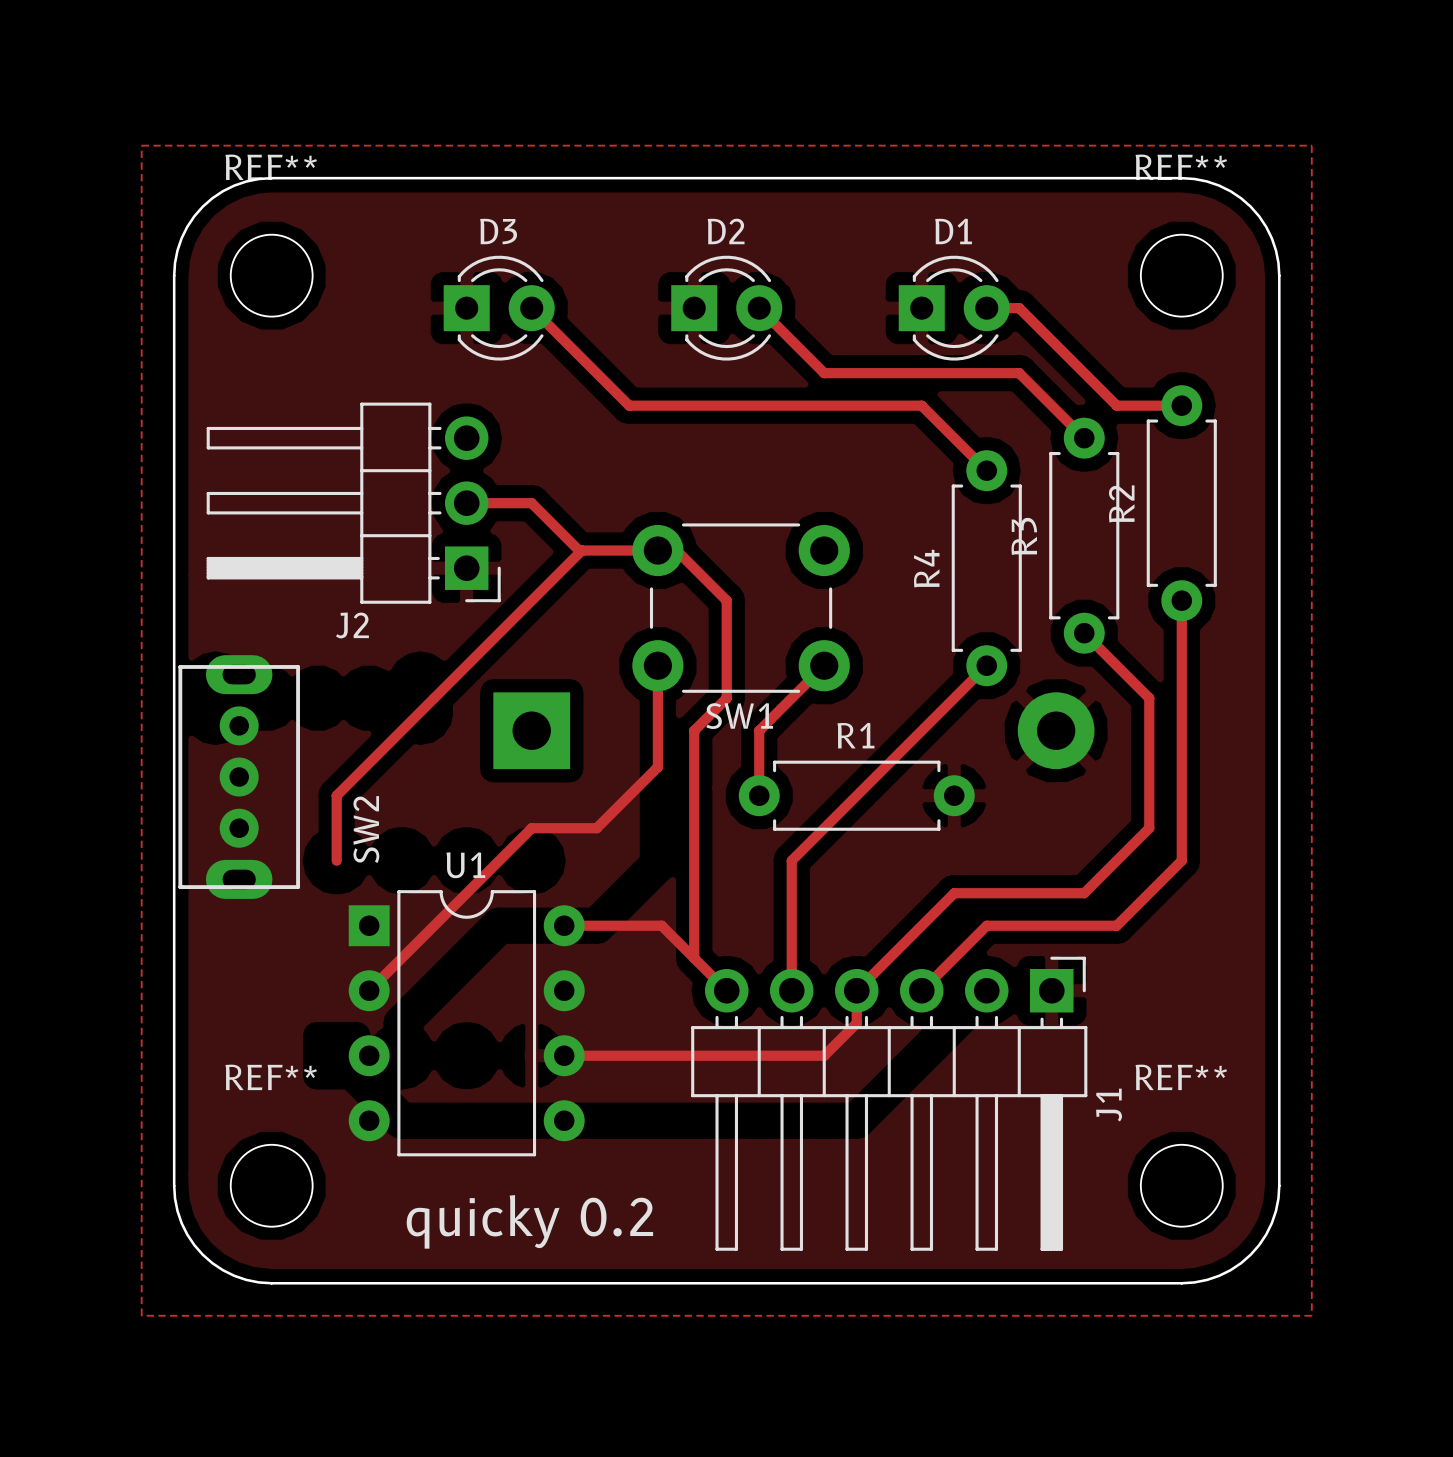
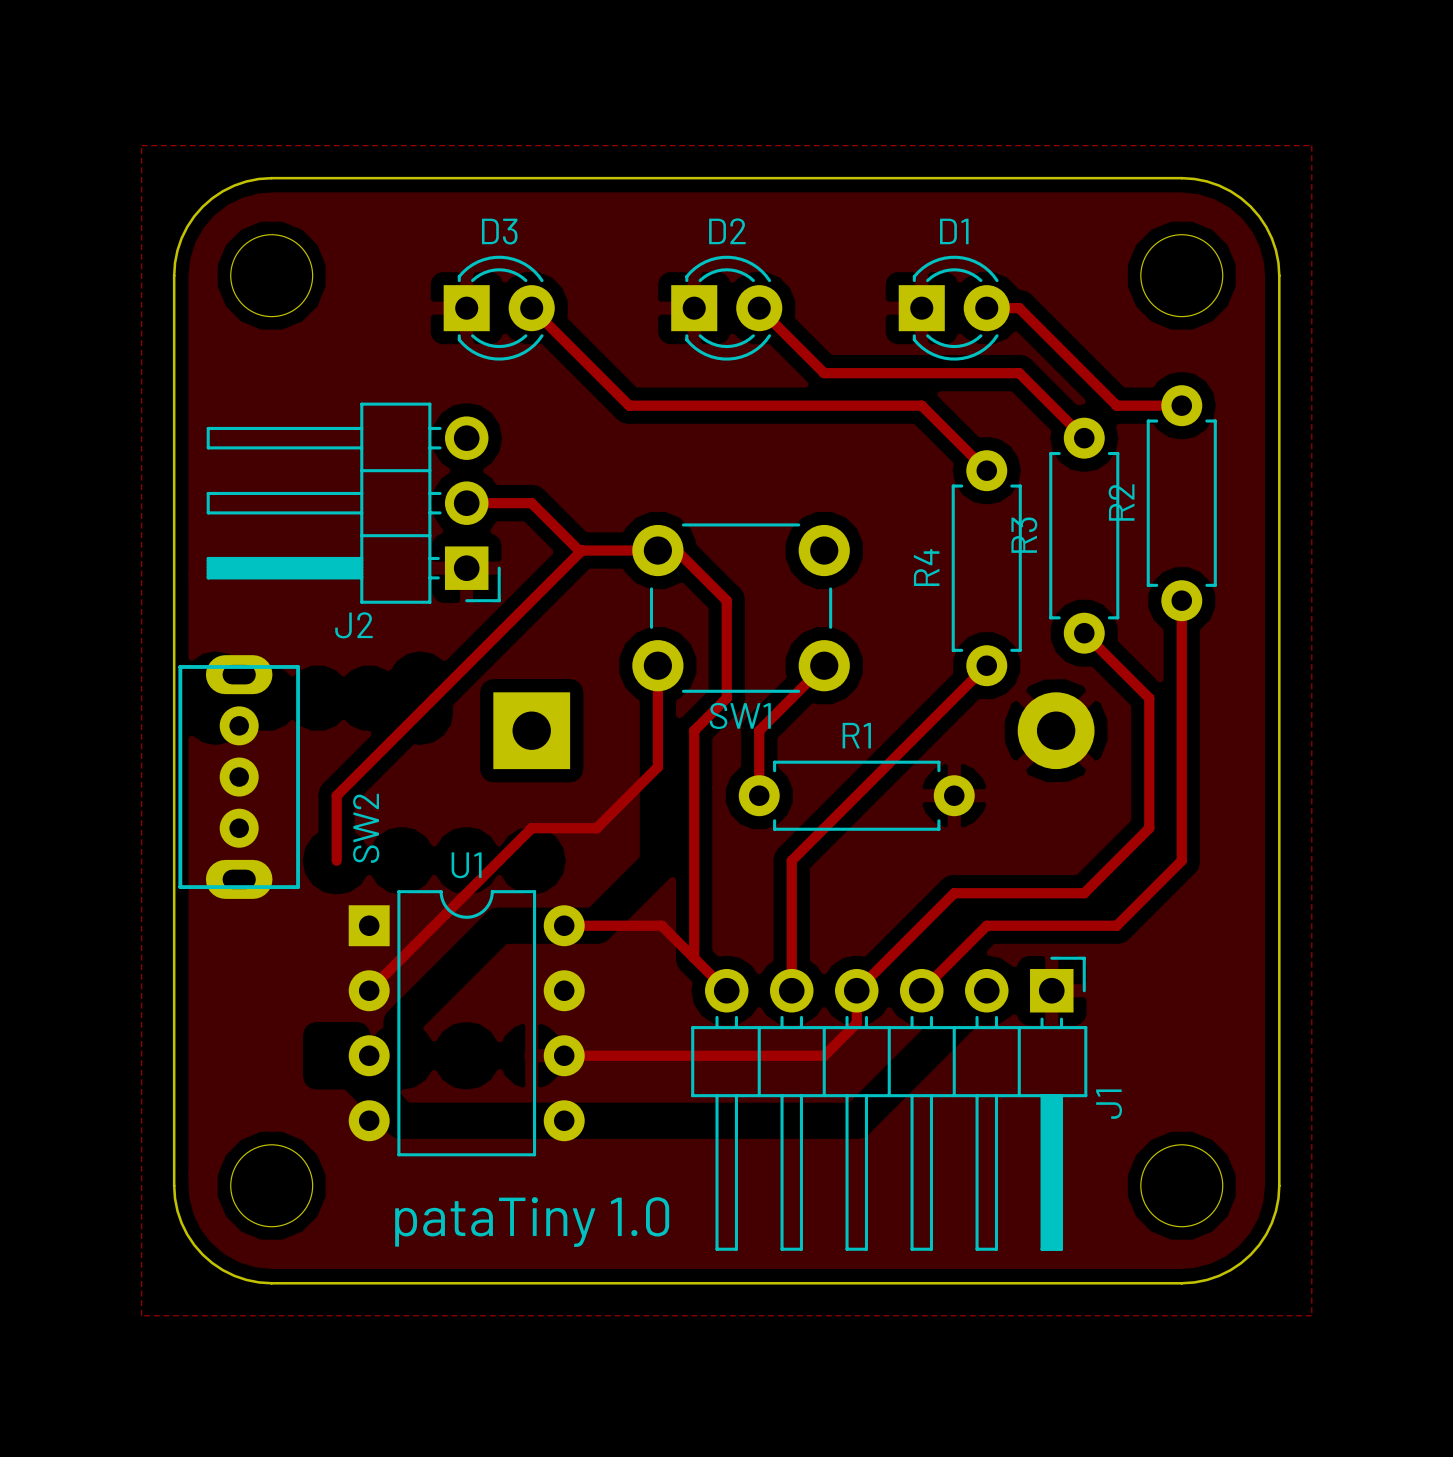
REF** name: REF** (271, 167) -> none
REF** name: REF** (1181, 167) -> none
REF** name: REF** (271, 1077) -> none
REF** name: REF** (1181, 1077) -> none
text: quicky 0.2 (529, 1221) -> pataTiny 1.0 (532, 1222)

